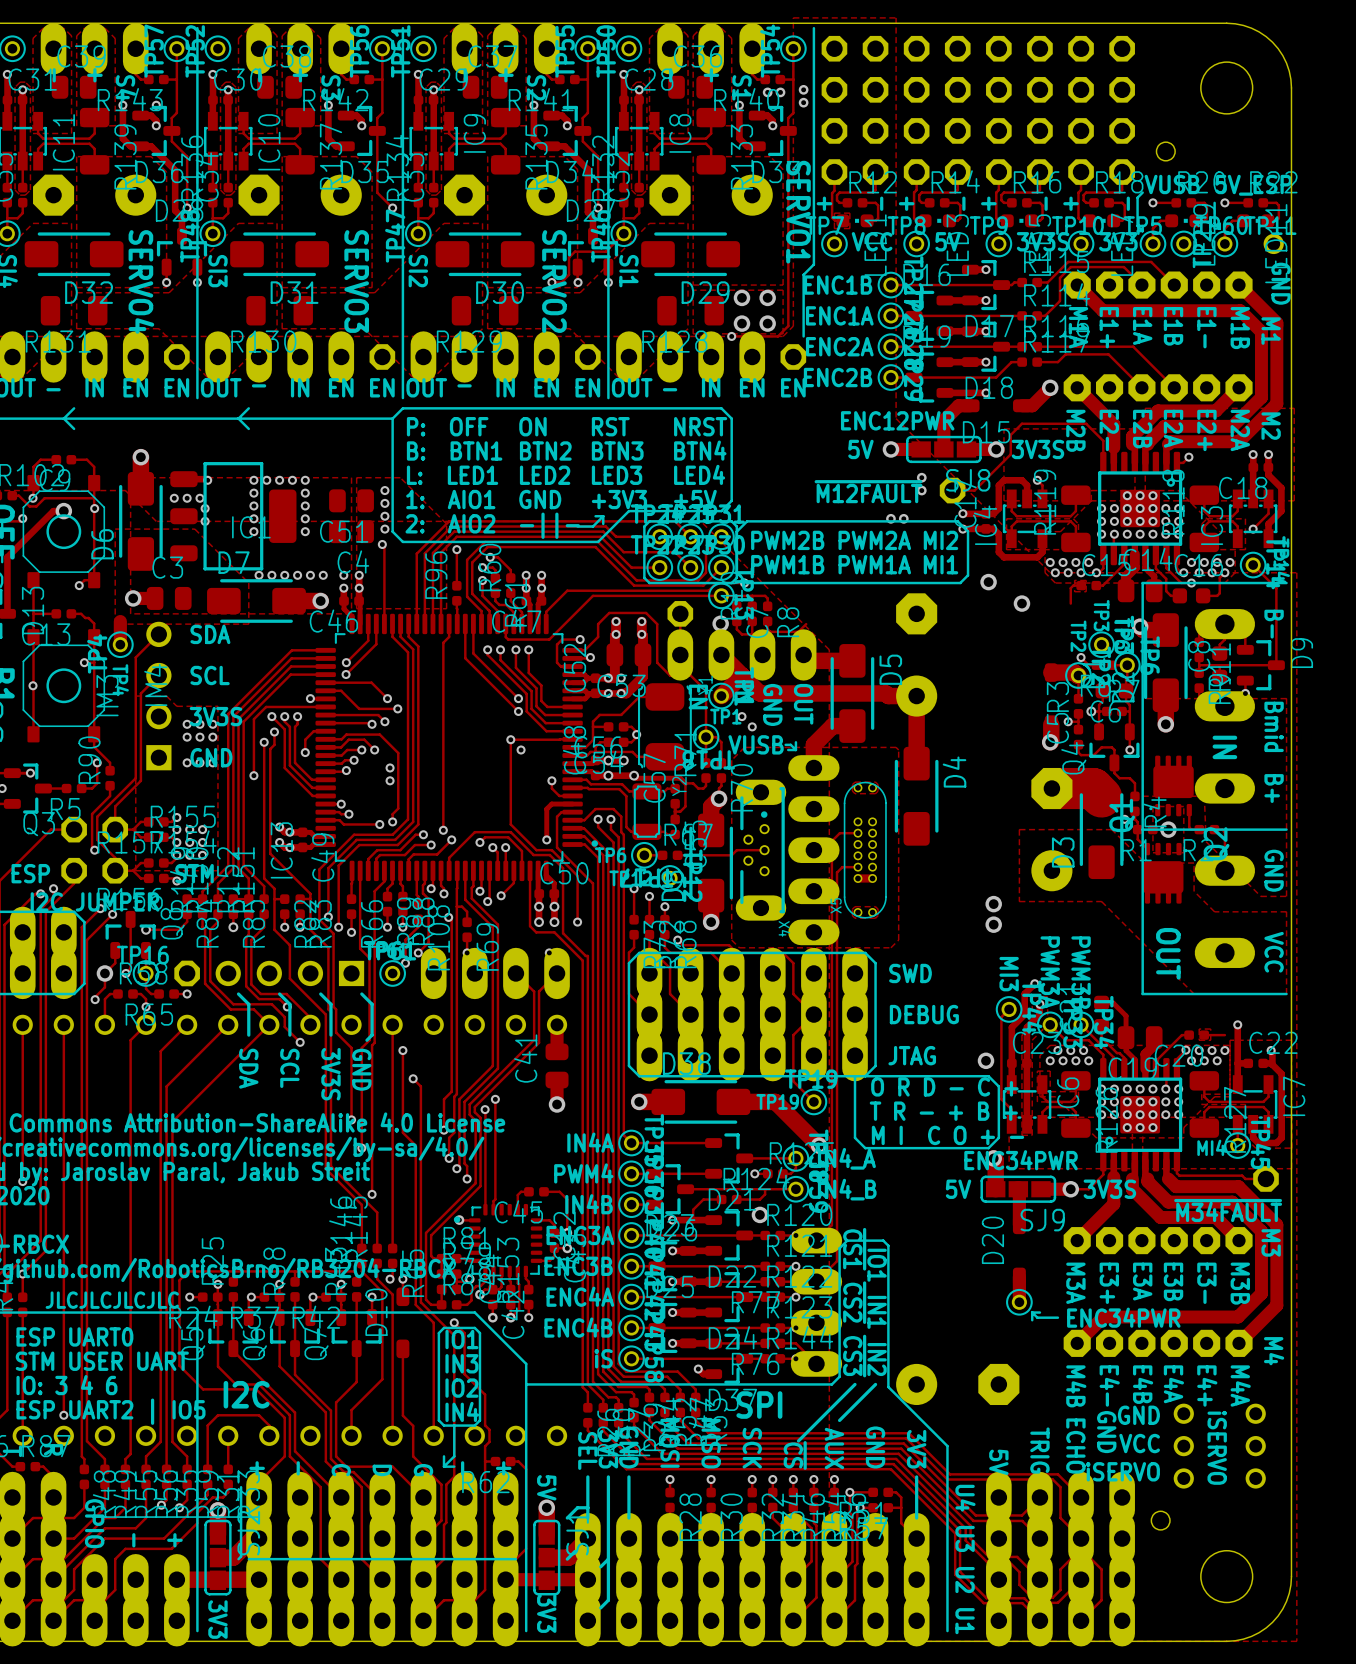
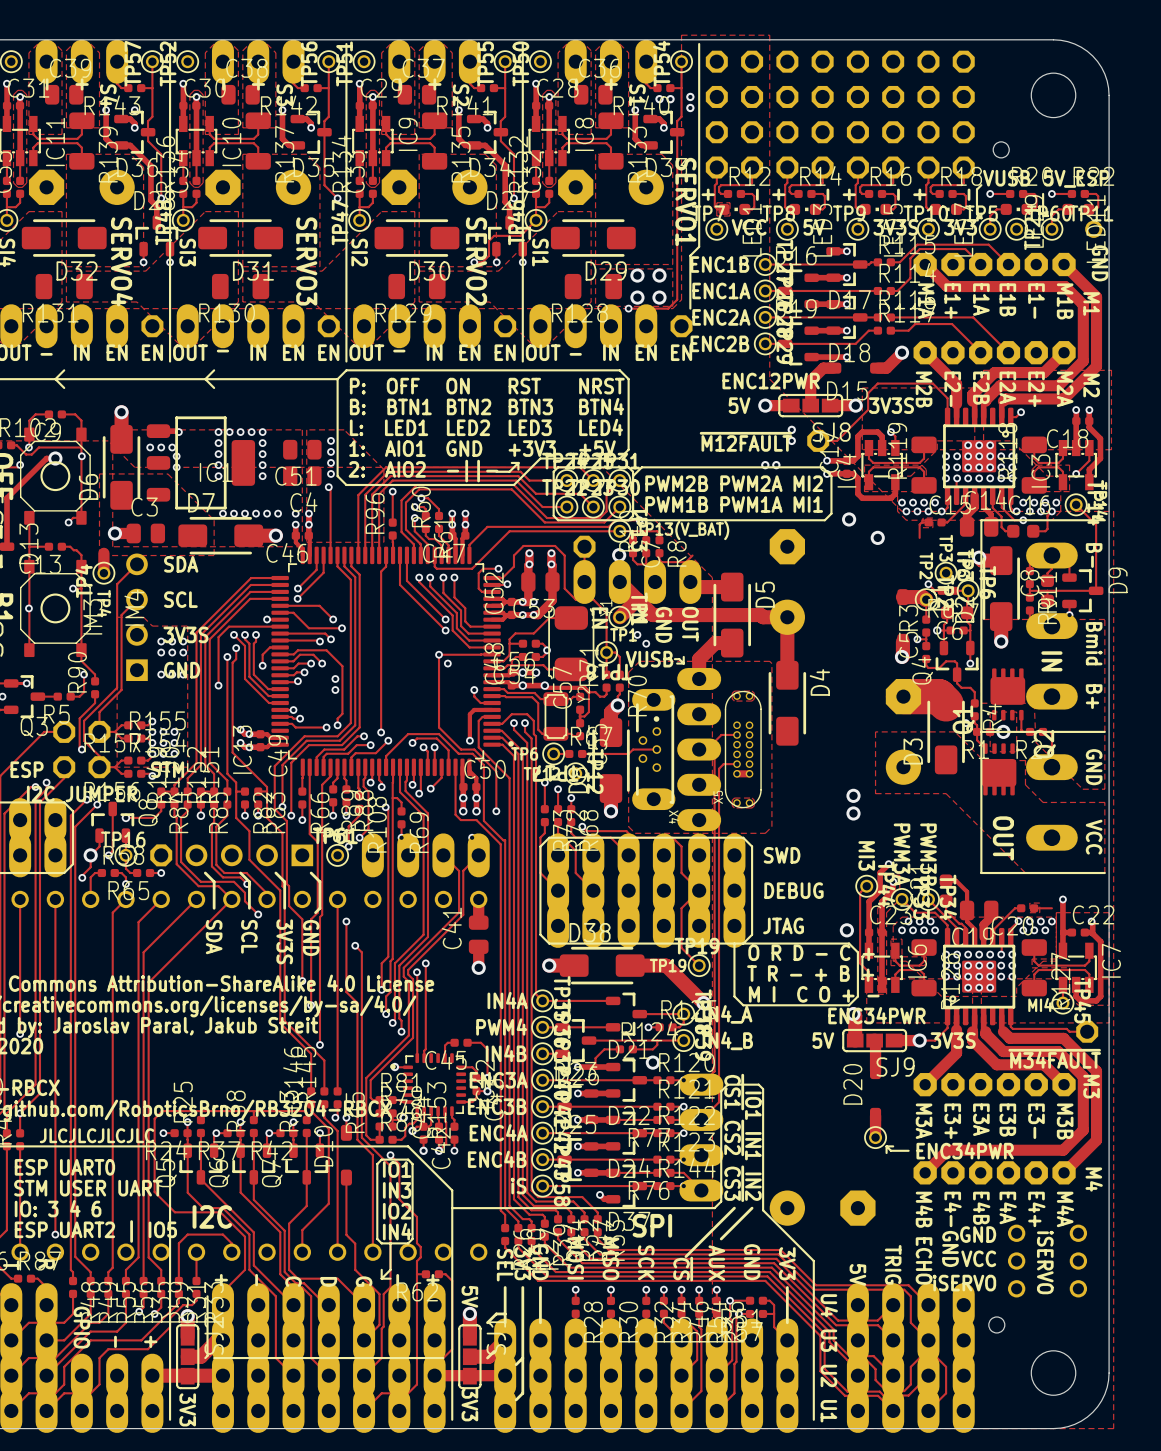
text: none -> TP13(V_BAT) (682, 530)

